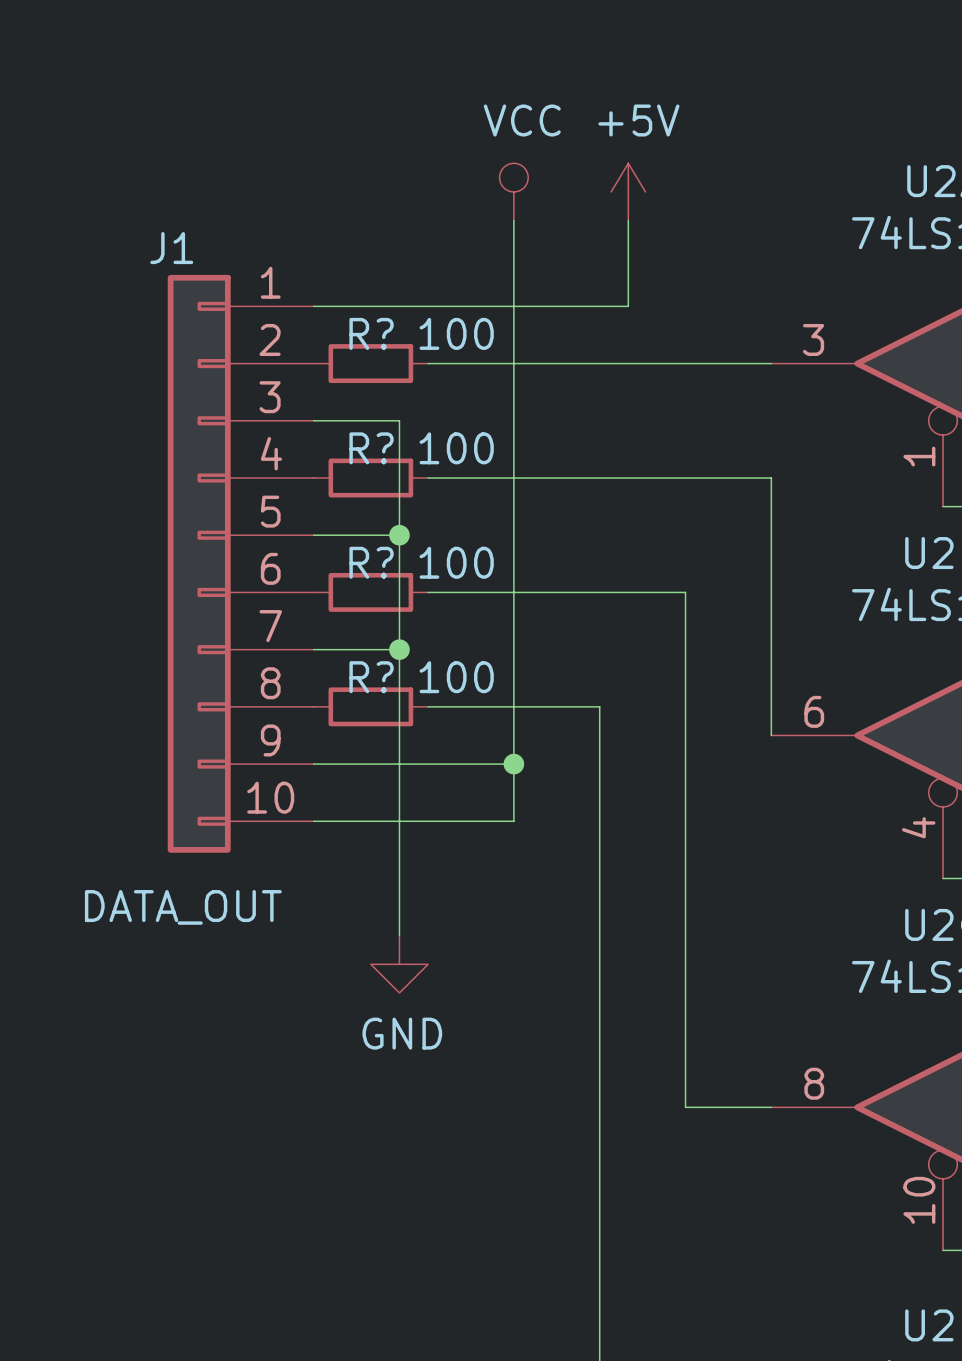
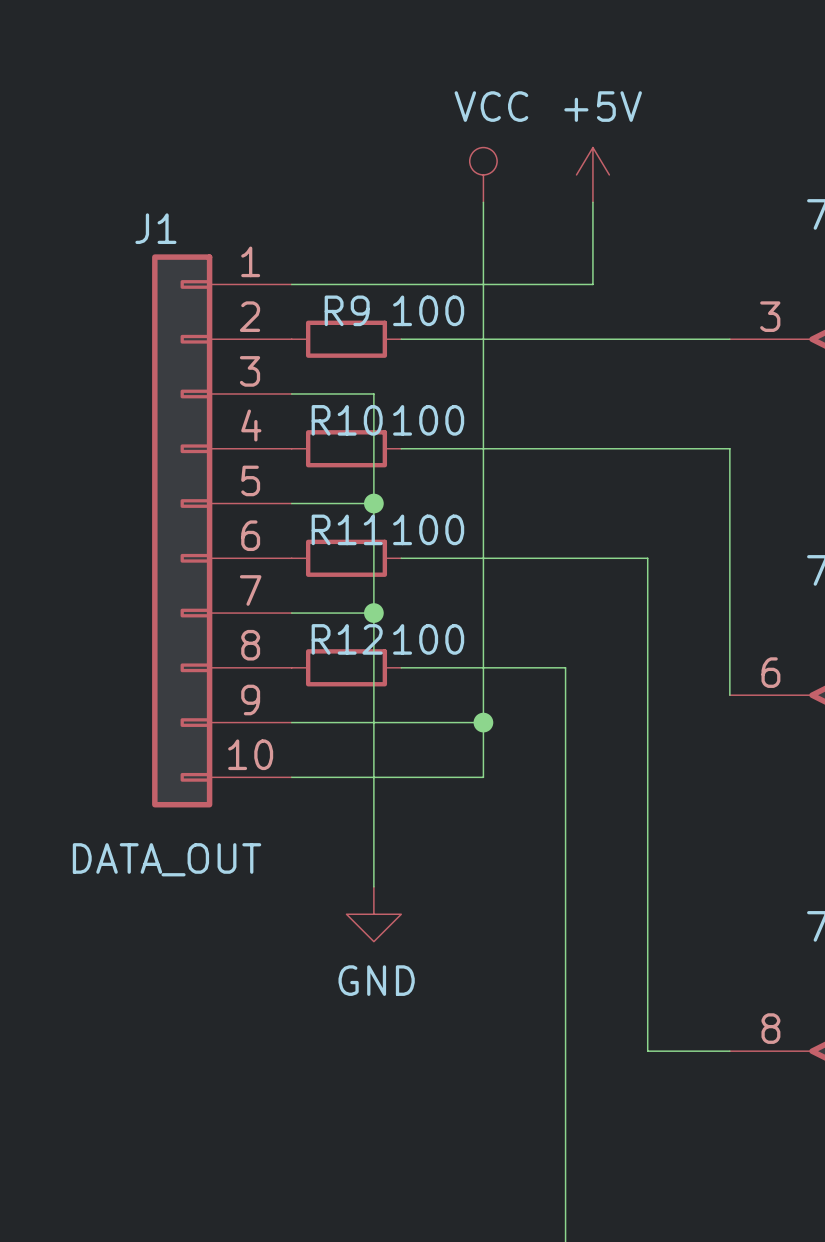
R? name: R? (371, 333) -> R9 (347, 310)
R? name: R? (371, 448) -> R10 (347, 420)
R? name: R? (371, 562) -> R11 (347, 529)
R? name: R? (371, 677) -> R12 (347, 639)

